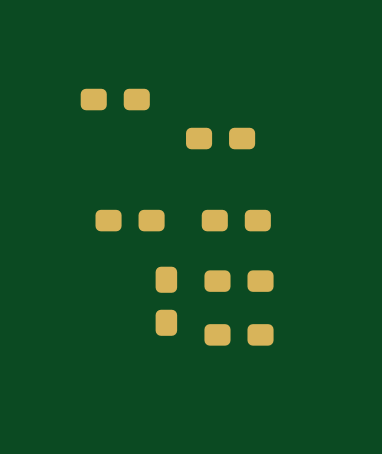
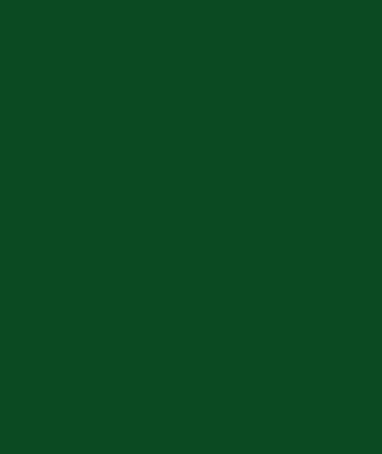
part: (115, 99) -> none
part: (220, 138) -> none
part: (130, 220) -> none
part: (236, 220) -> none
part: (239, 281) -> none
part: (166, 301) -> none
part: (239, 334) -> none

